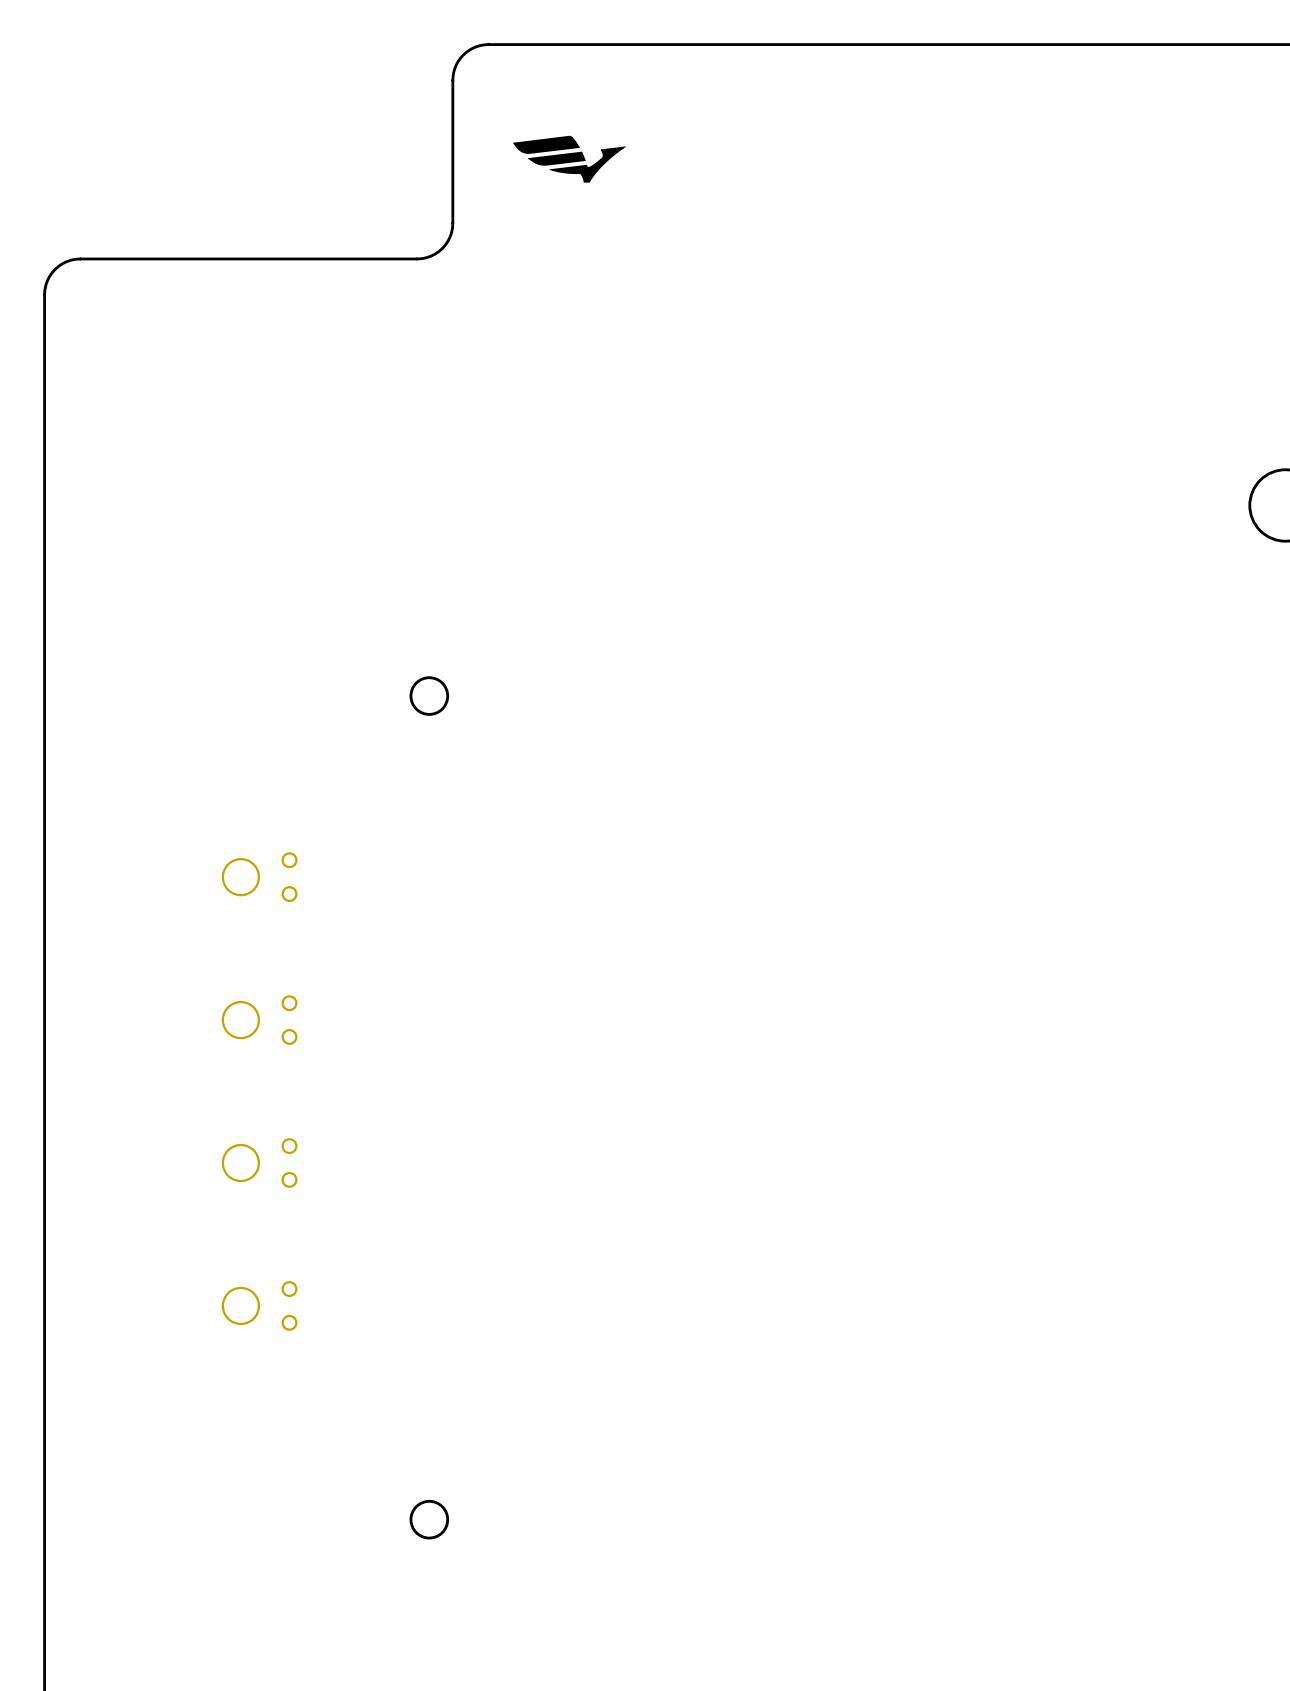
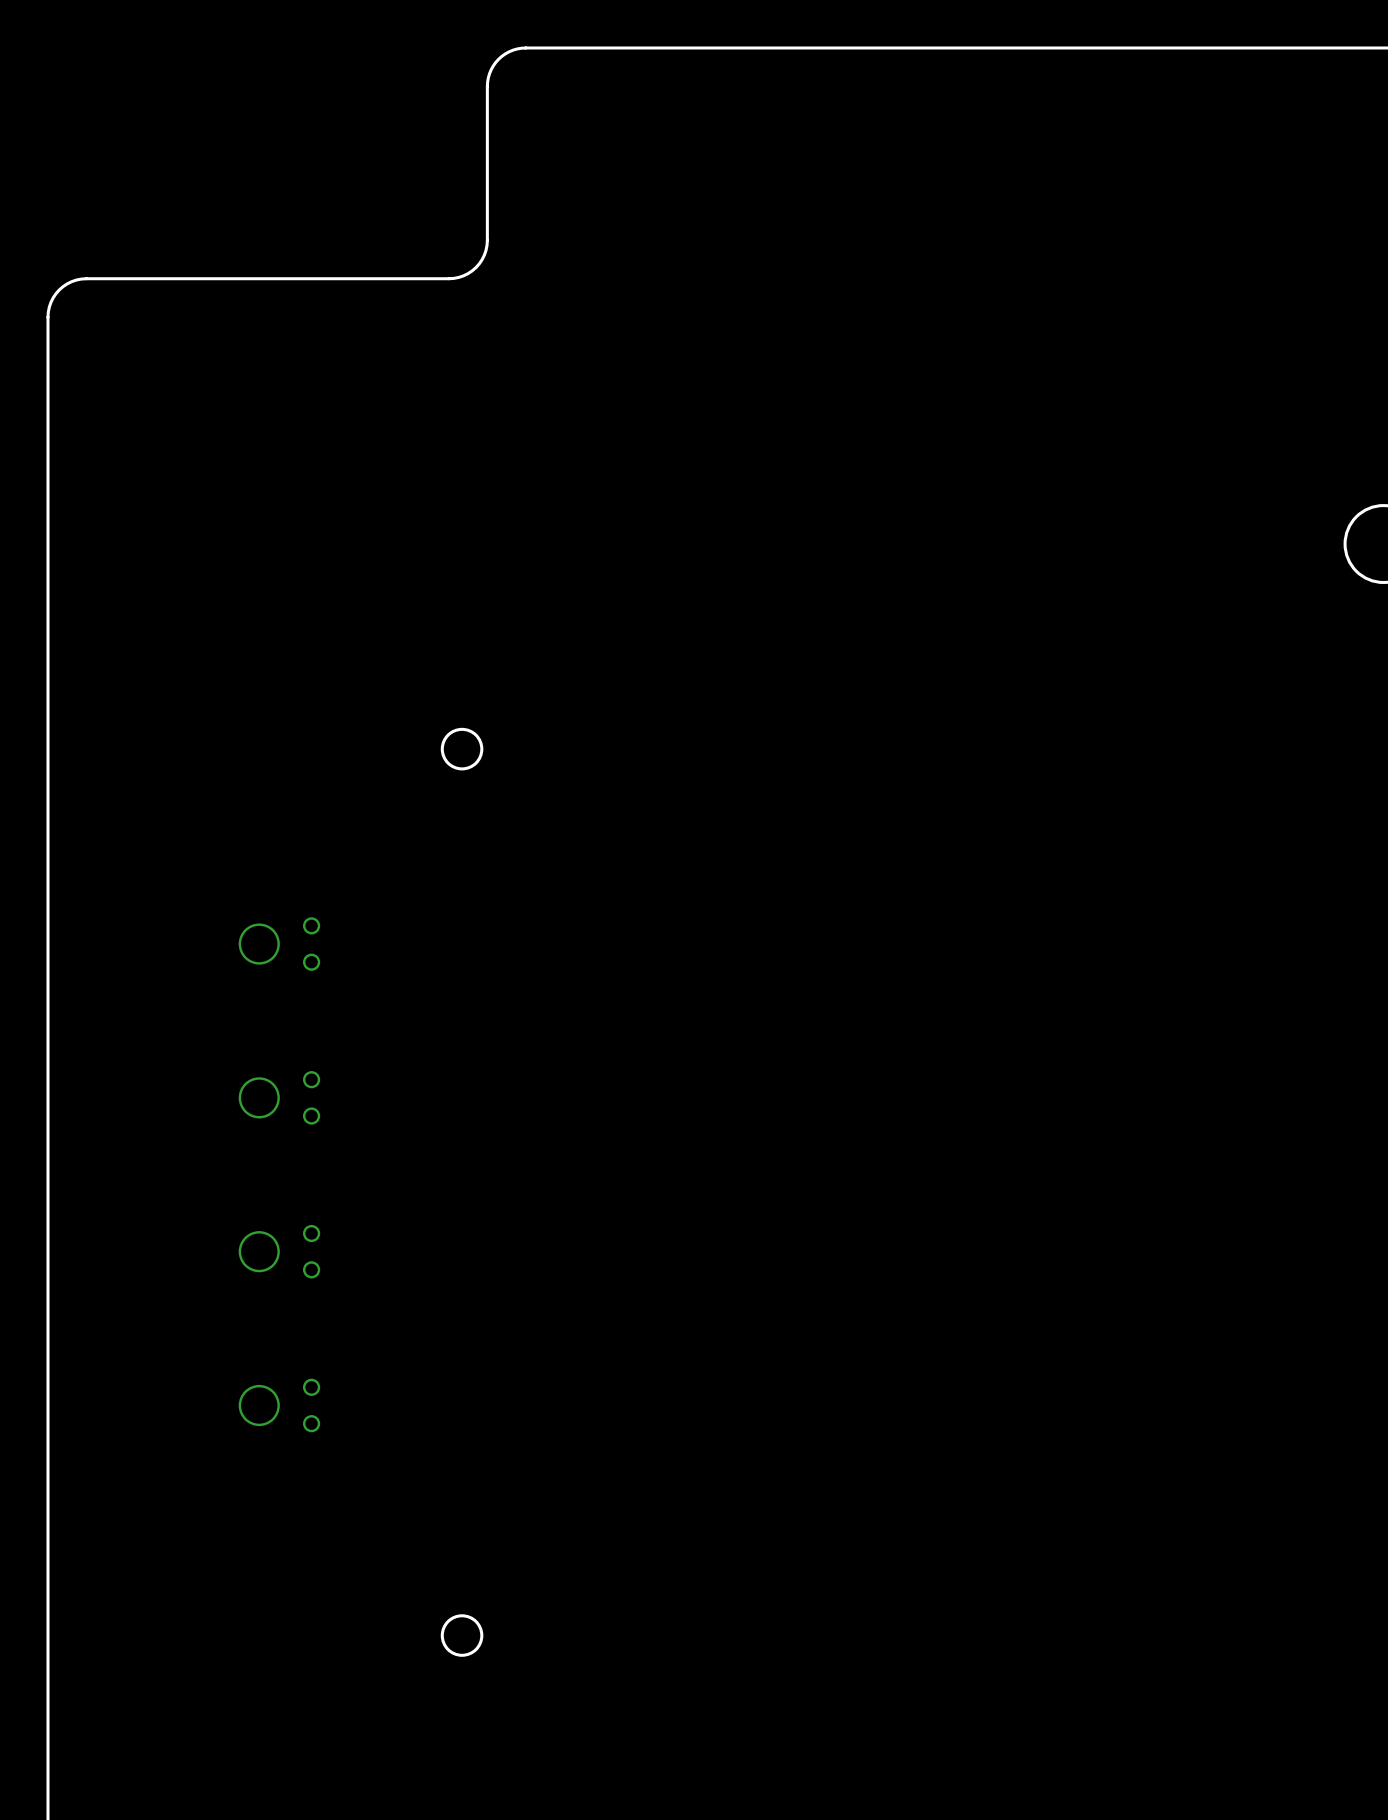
drawing: [513, 135, 626, 183] -> none

